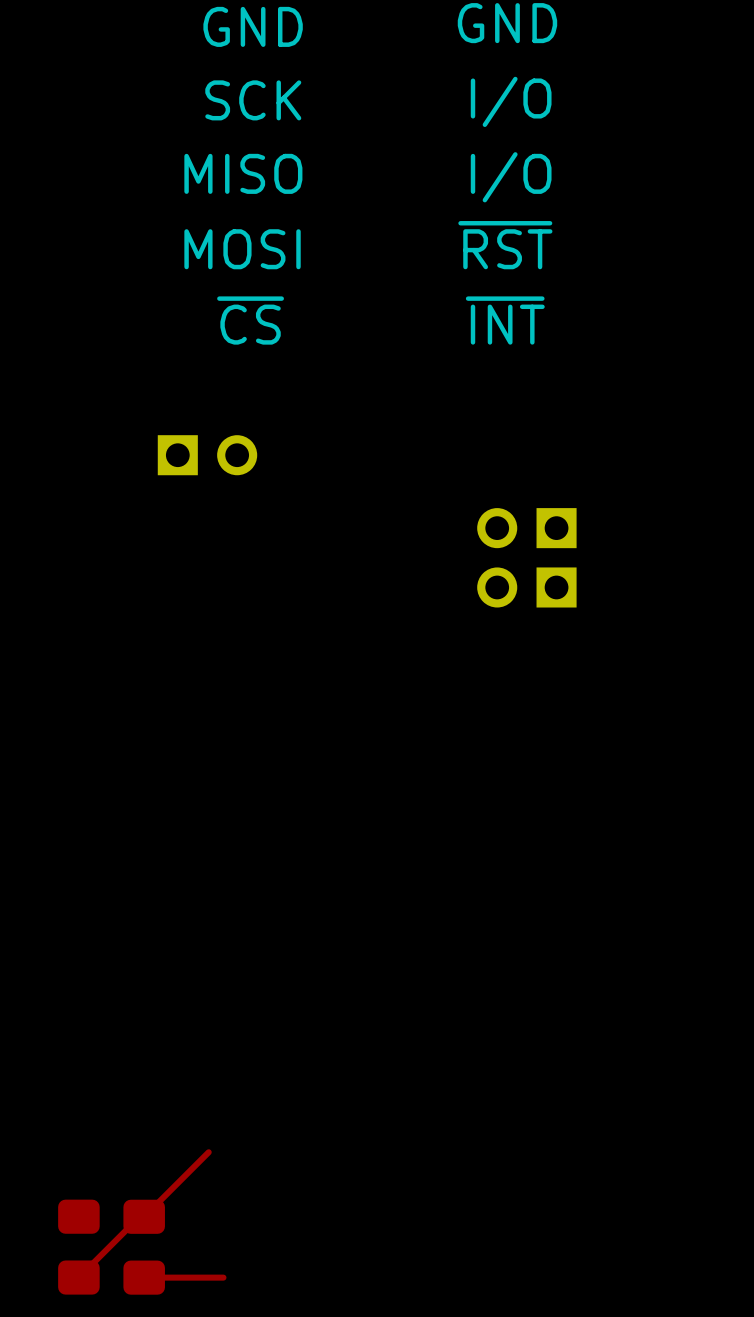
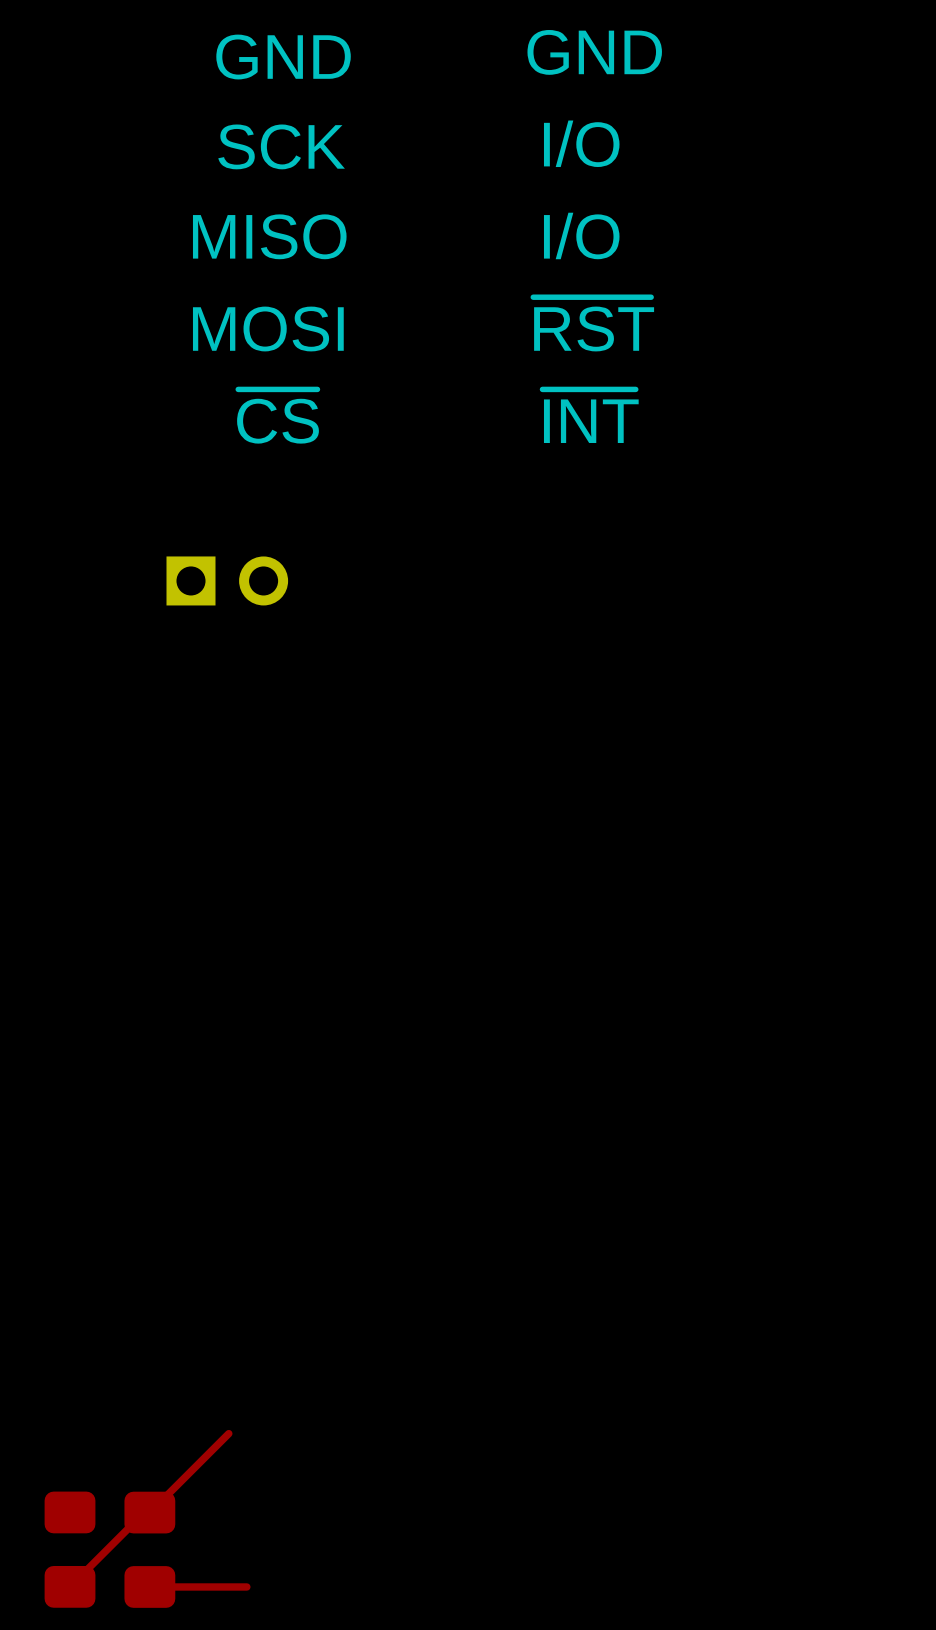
part: (526, 528) -> none
part: (526, 587) -> none

